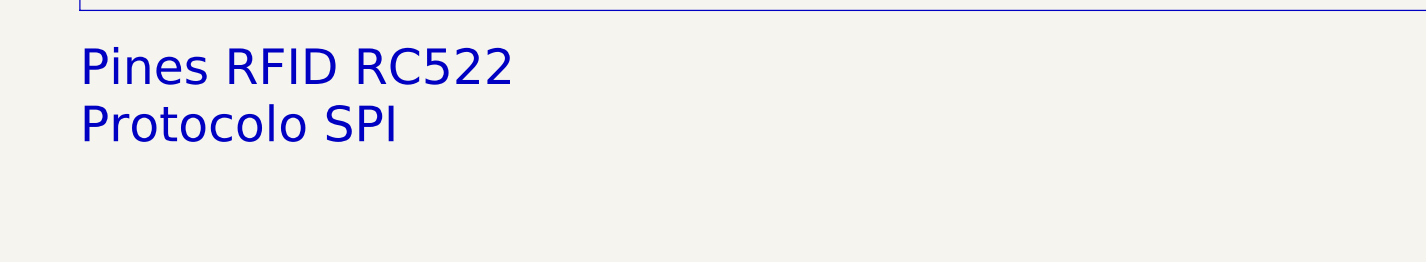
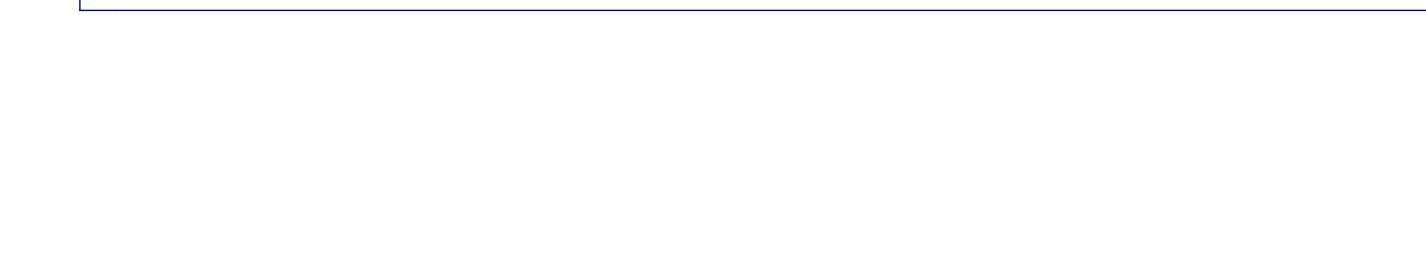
text: Pines RFID RC522 (297, 65) -> none
text: Protocolo SPI (239, 123) -> none

